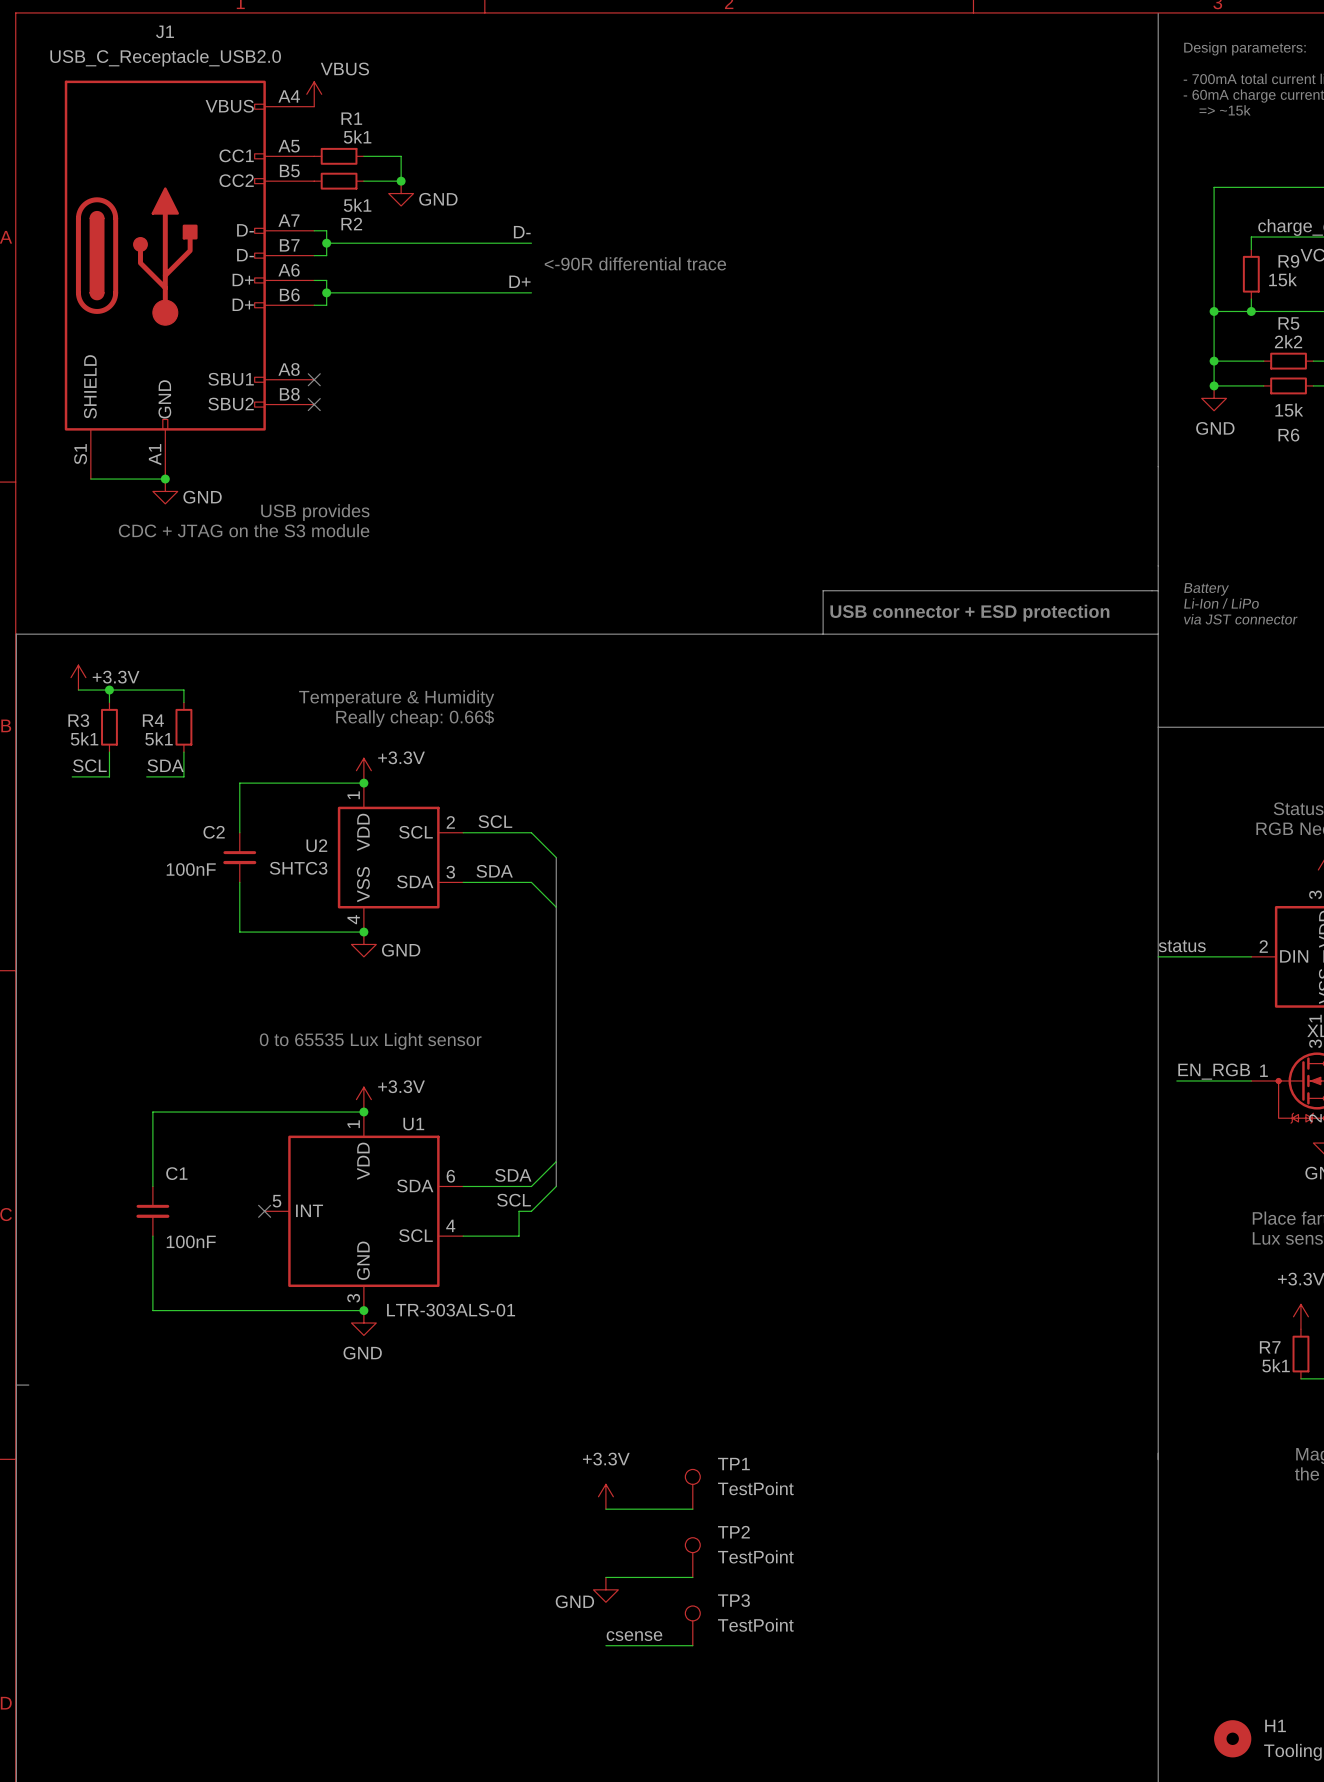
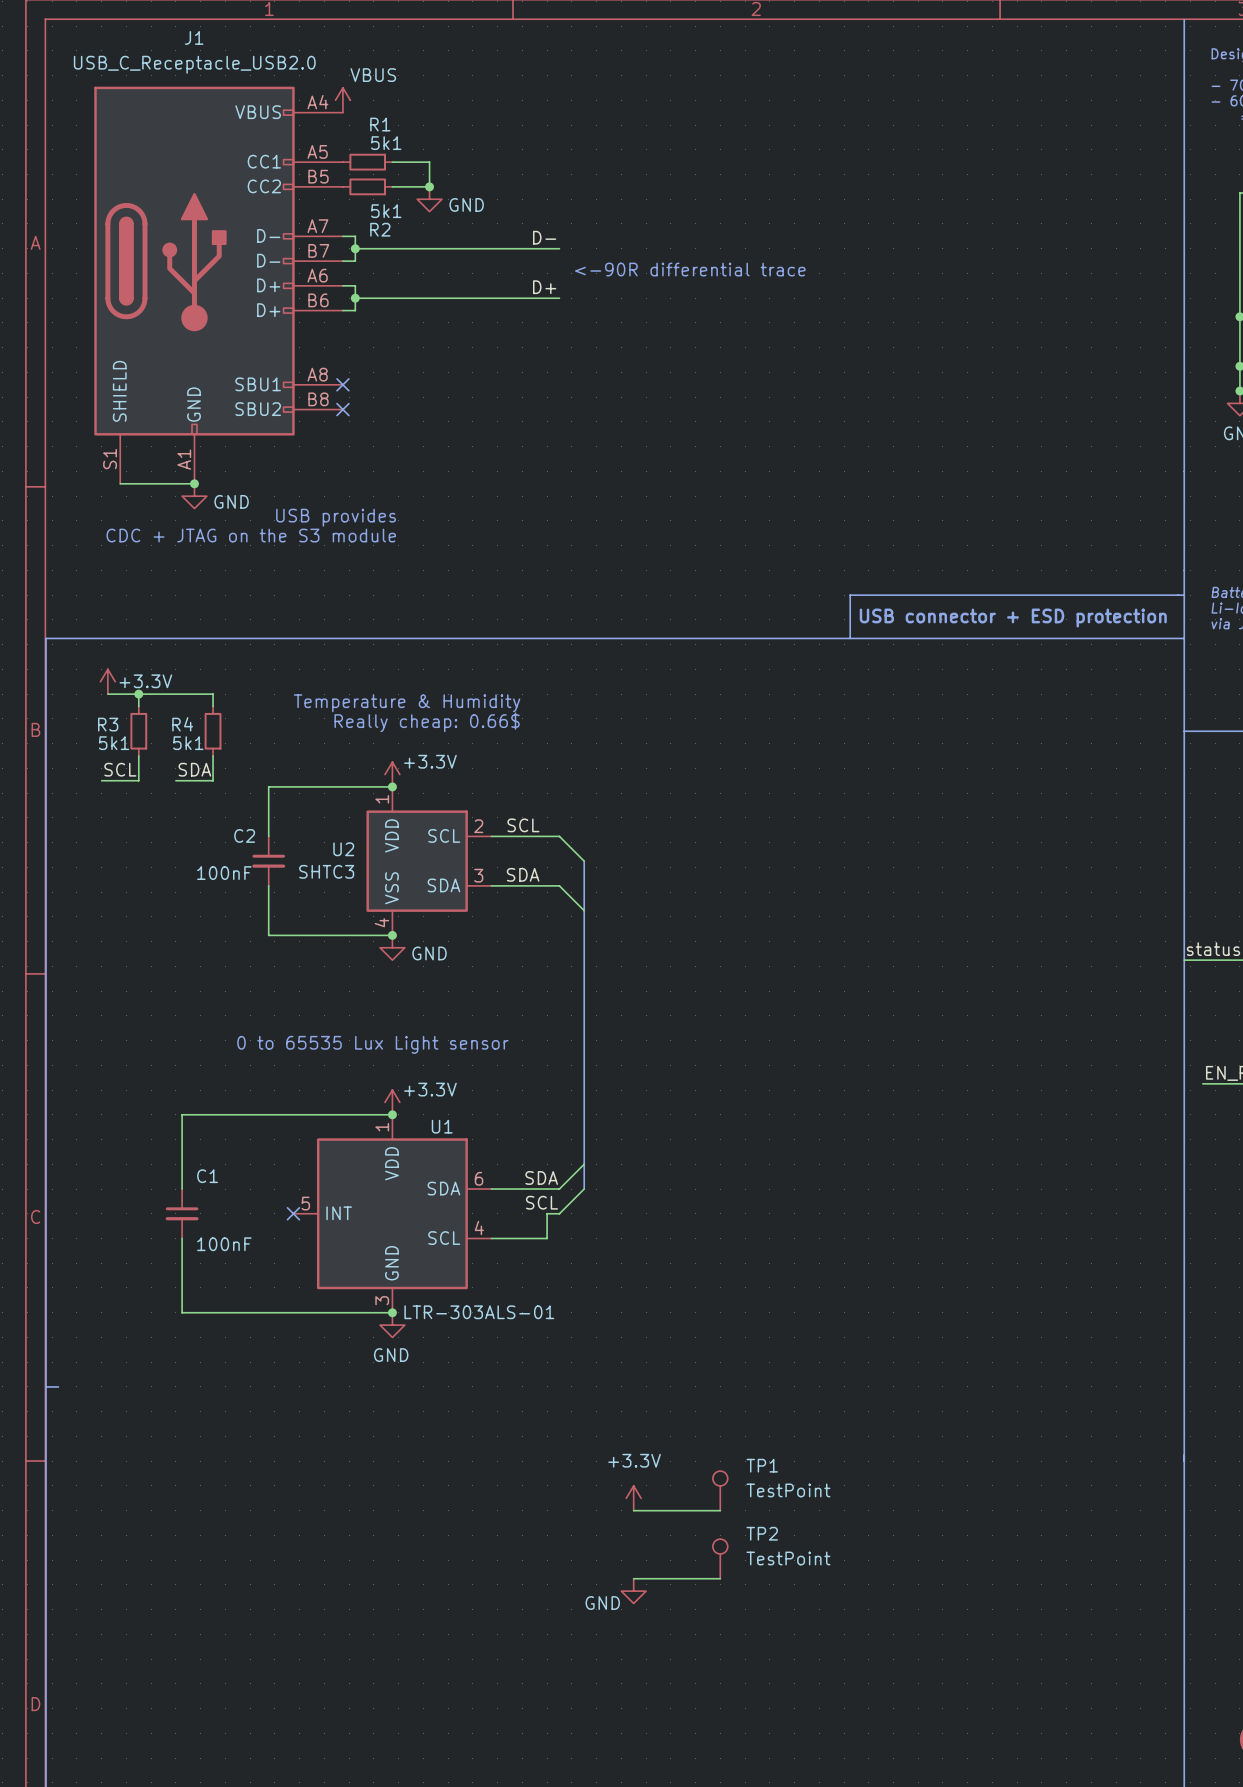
TP3: TestPoint (692, 1625) -> none
label: csense (634, 1636) -> none
wire: (605, 1645) (692, 1645) -> none

